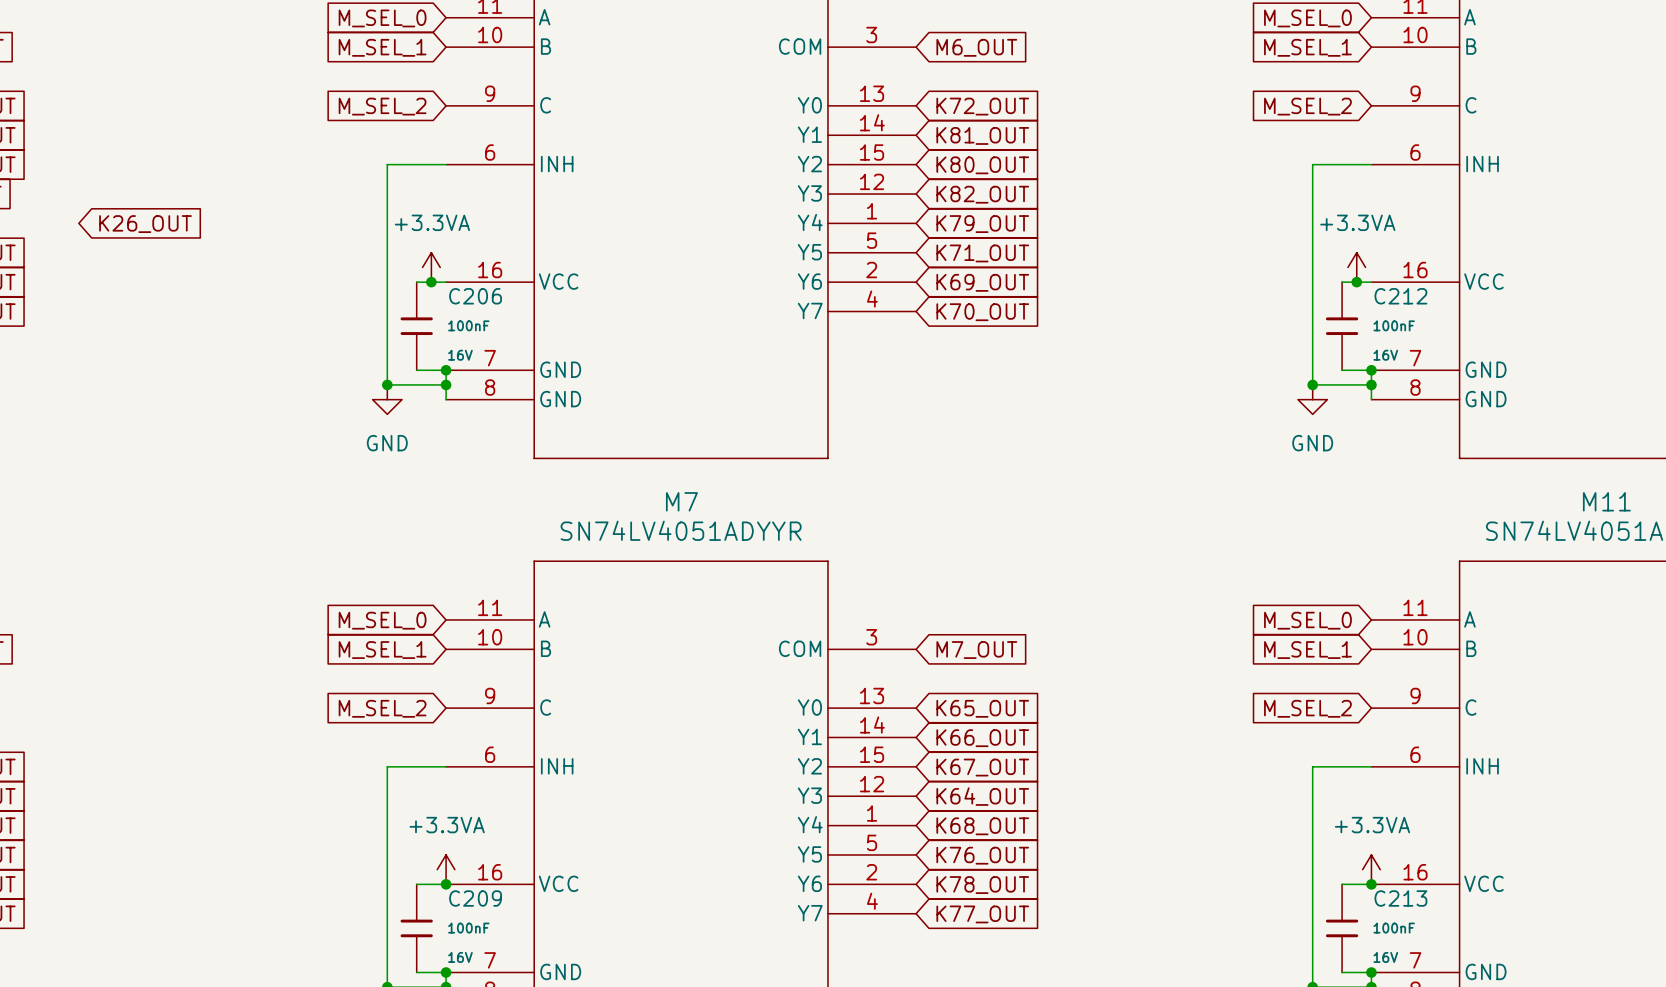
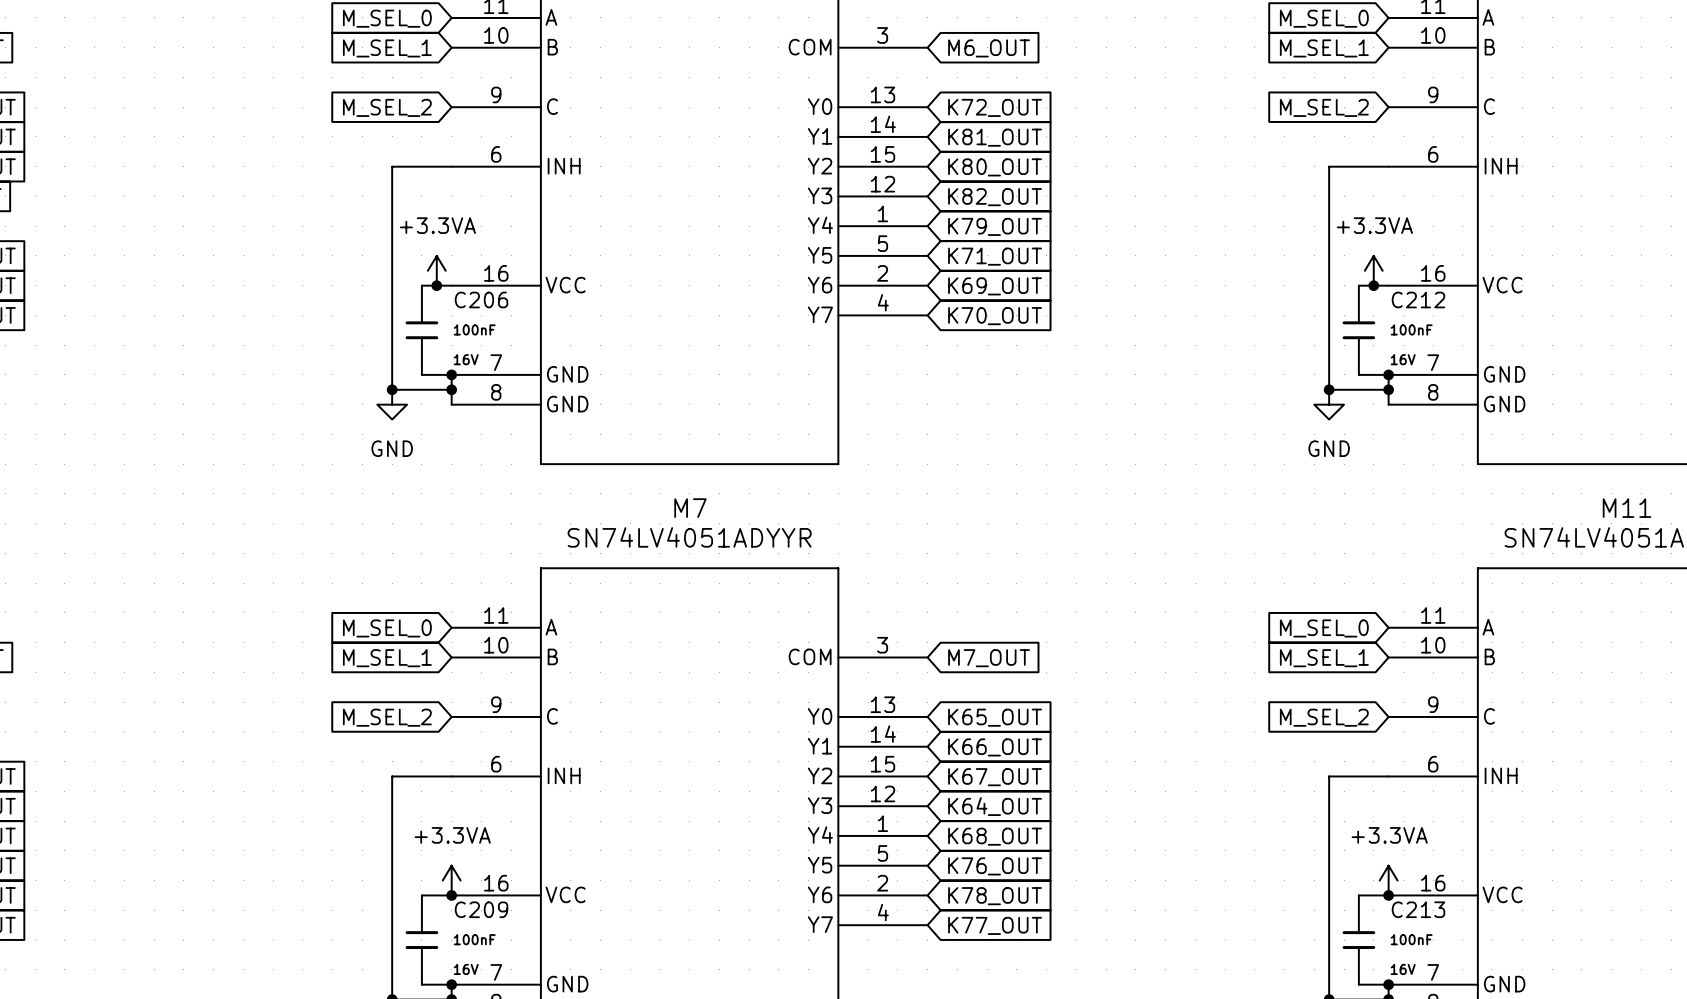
global label: K26_OUT (145, 224) -> none

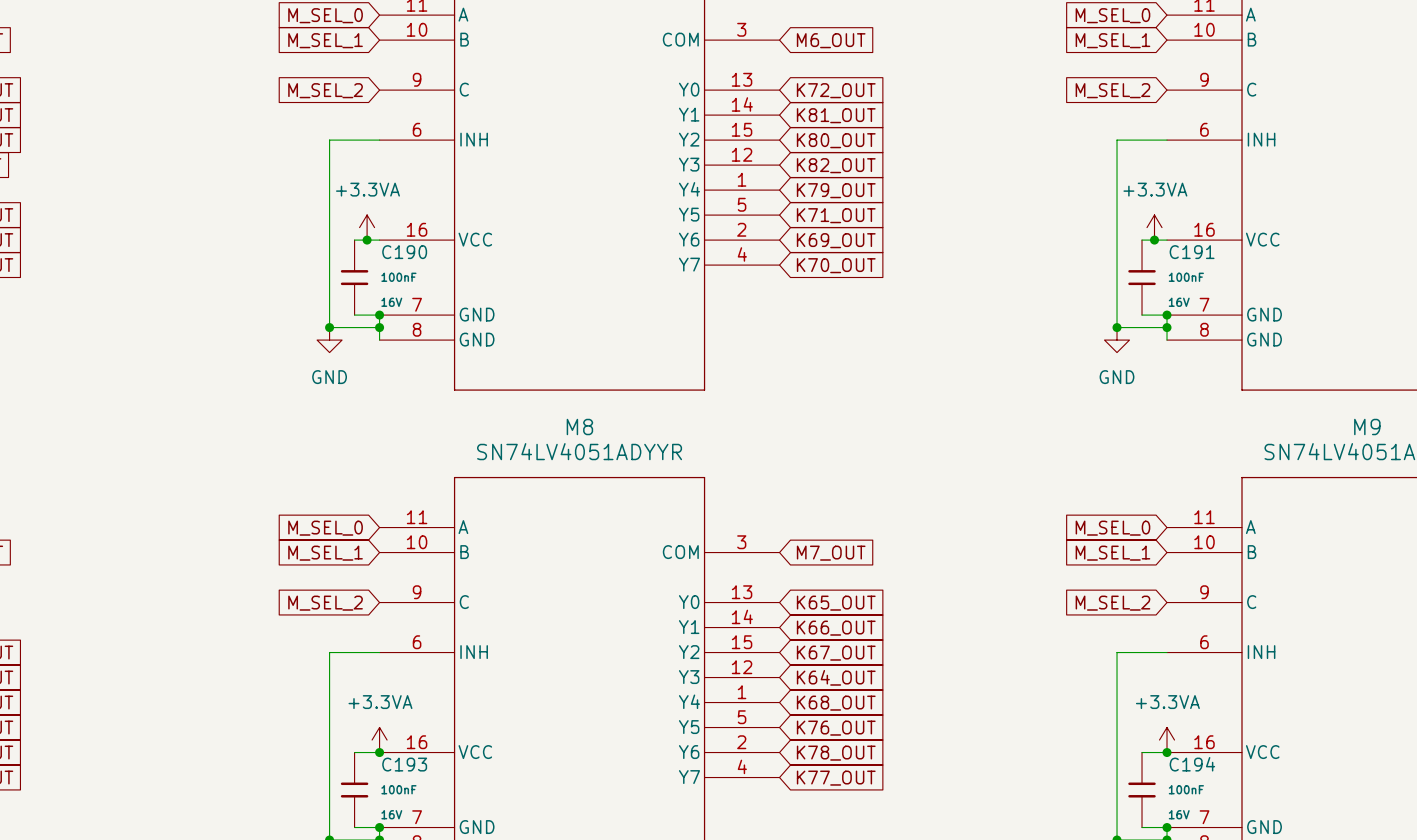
C206 name: C206 (481, 299) -> C190 (404, 252)
C212 name: C212 (1418, 299) -> C191 (1192, 252)
M7 name: M7 (690, 508) -> M8 (579, 427)
M11 name: M11 (1627, 508) -> M9 (1367, 427)
C209 name: C209 (481, 909) -> C193 (404, 764)
C213 name: C213 (1418, 909) -> C194 (1192, 764)

